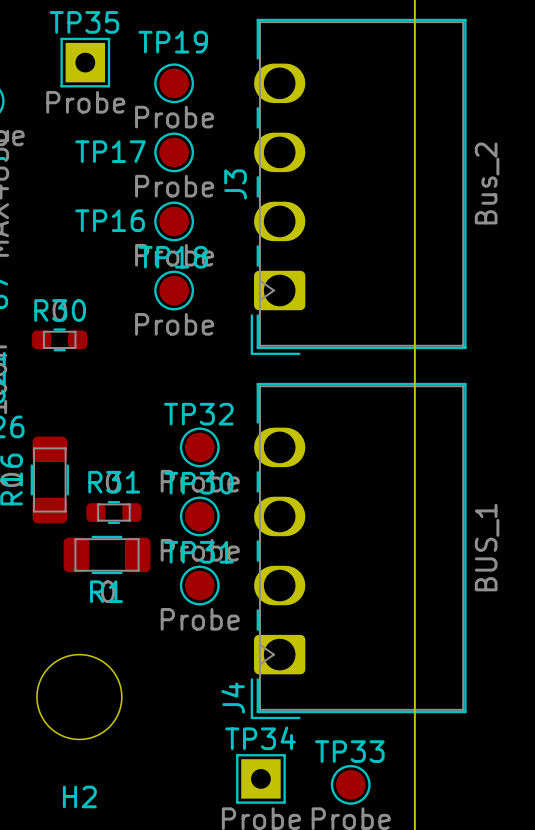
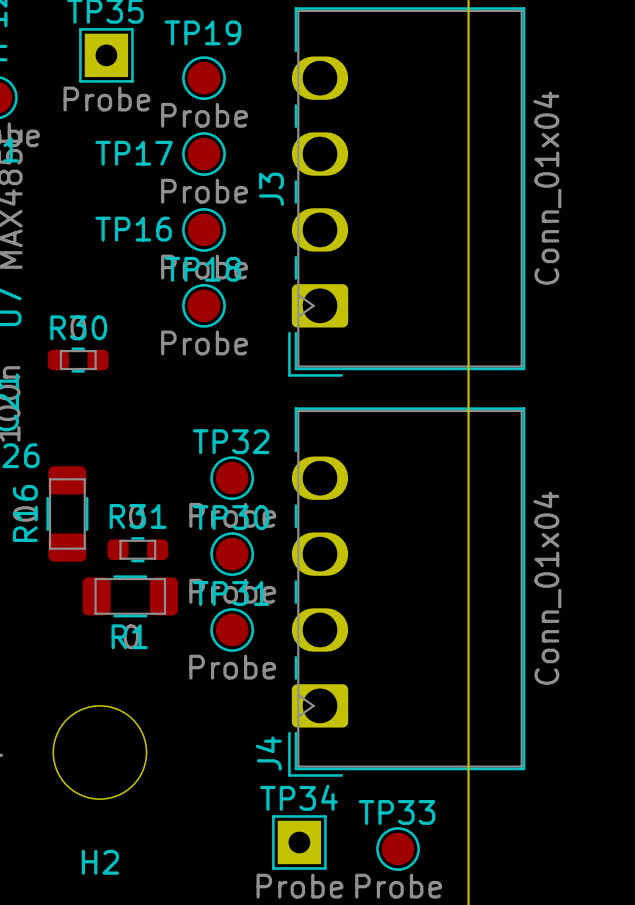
J3 value: Bus_2 (487, 183) -> Conn_01x04 (547, 188)
J4 value: BUS_1 (487, 547) -> Conn_01x04 (547, 588)

